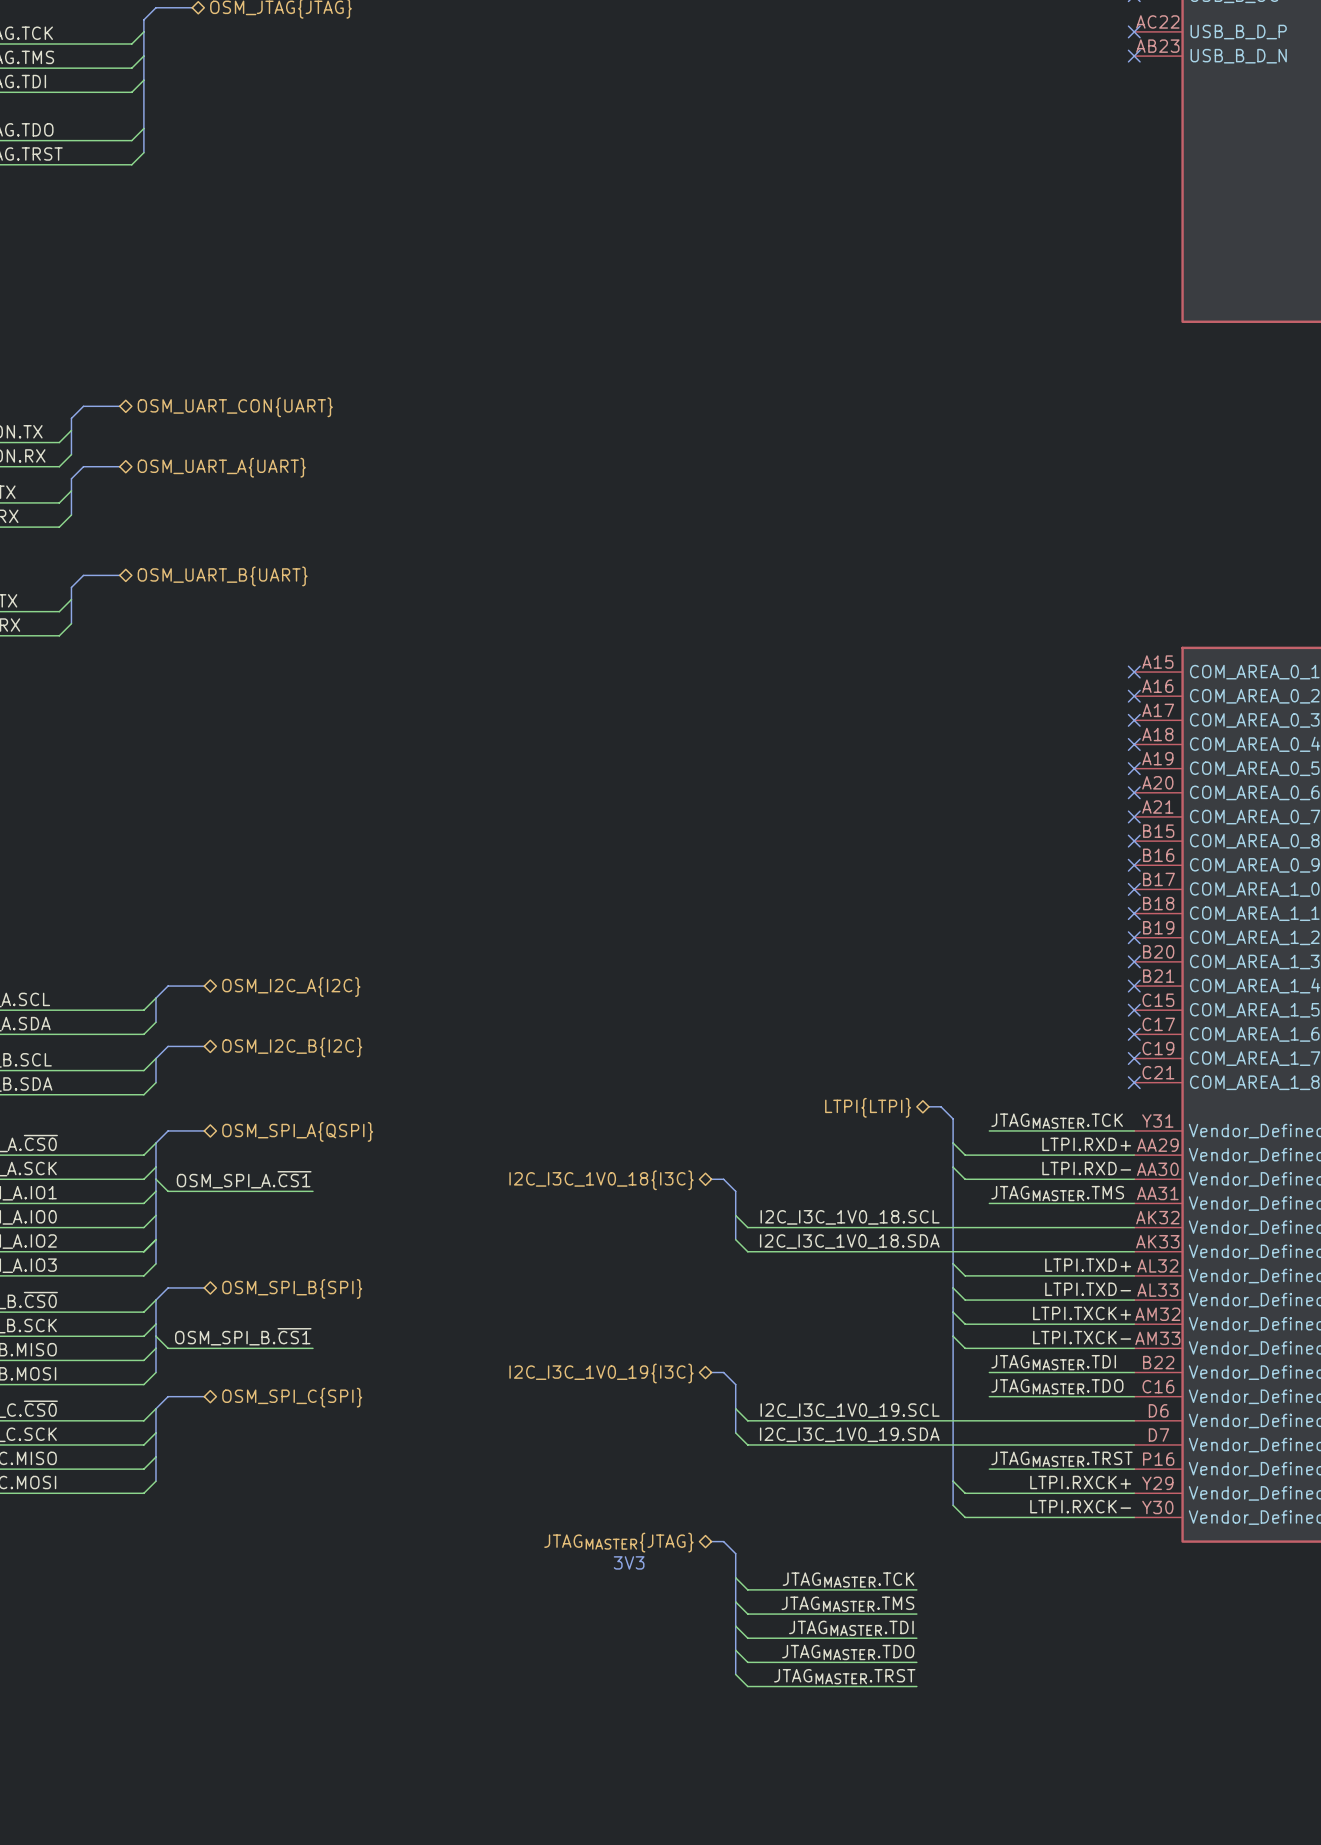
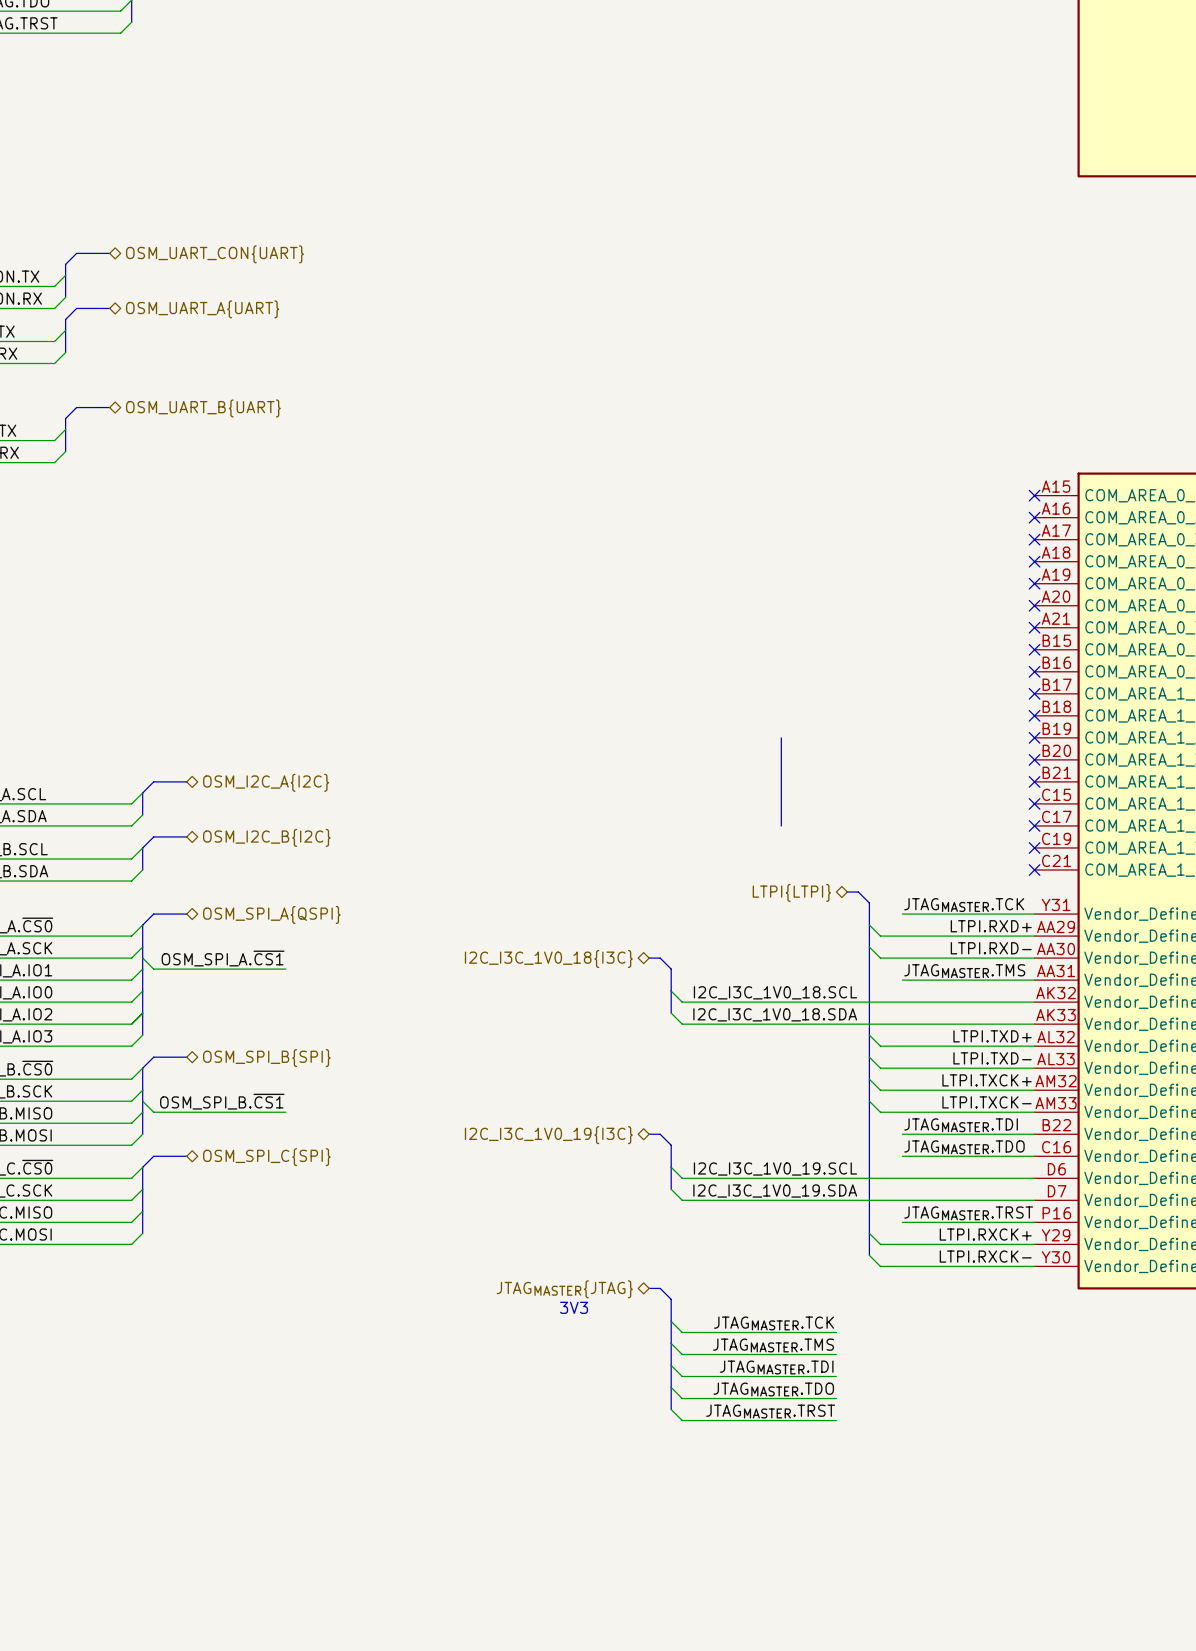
bus: none -> (781, 737) (781, 825)

